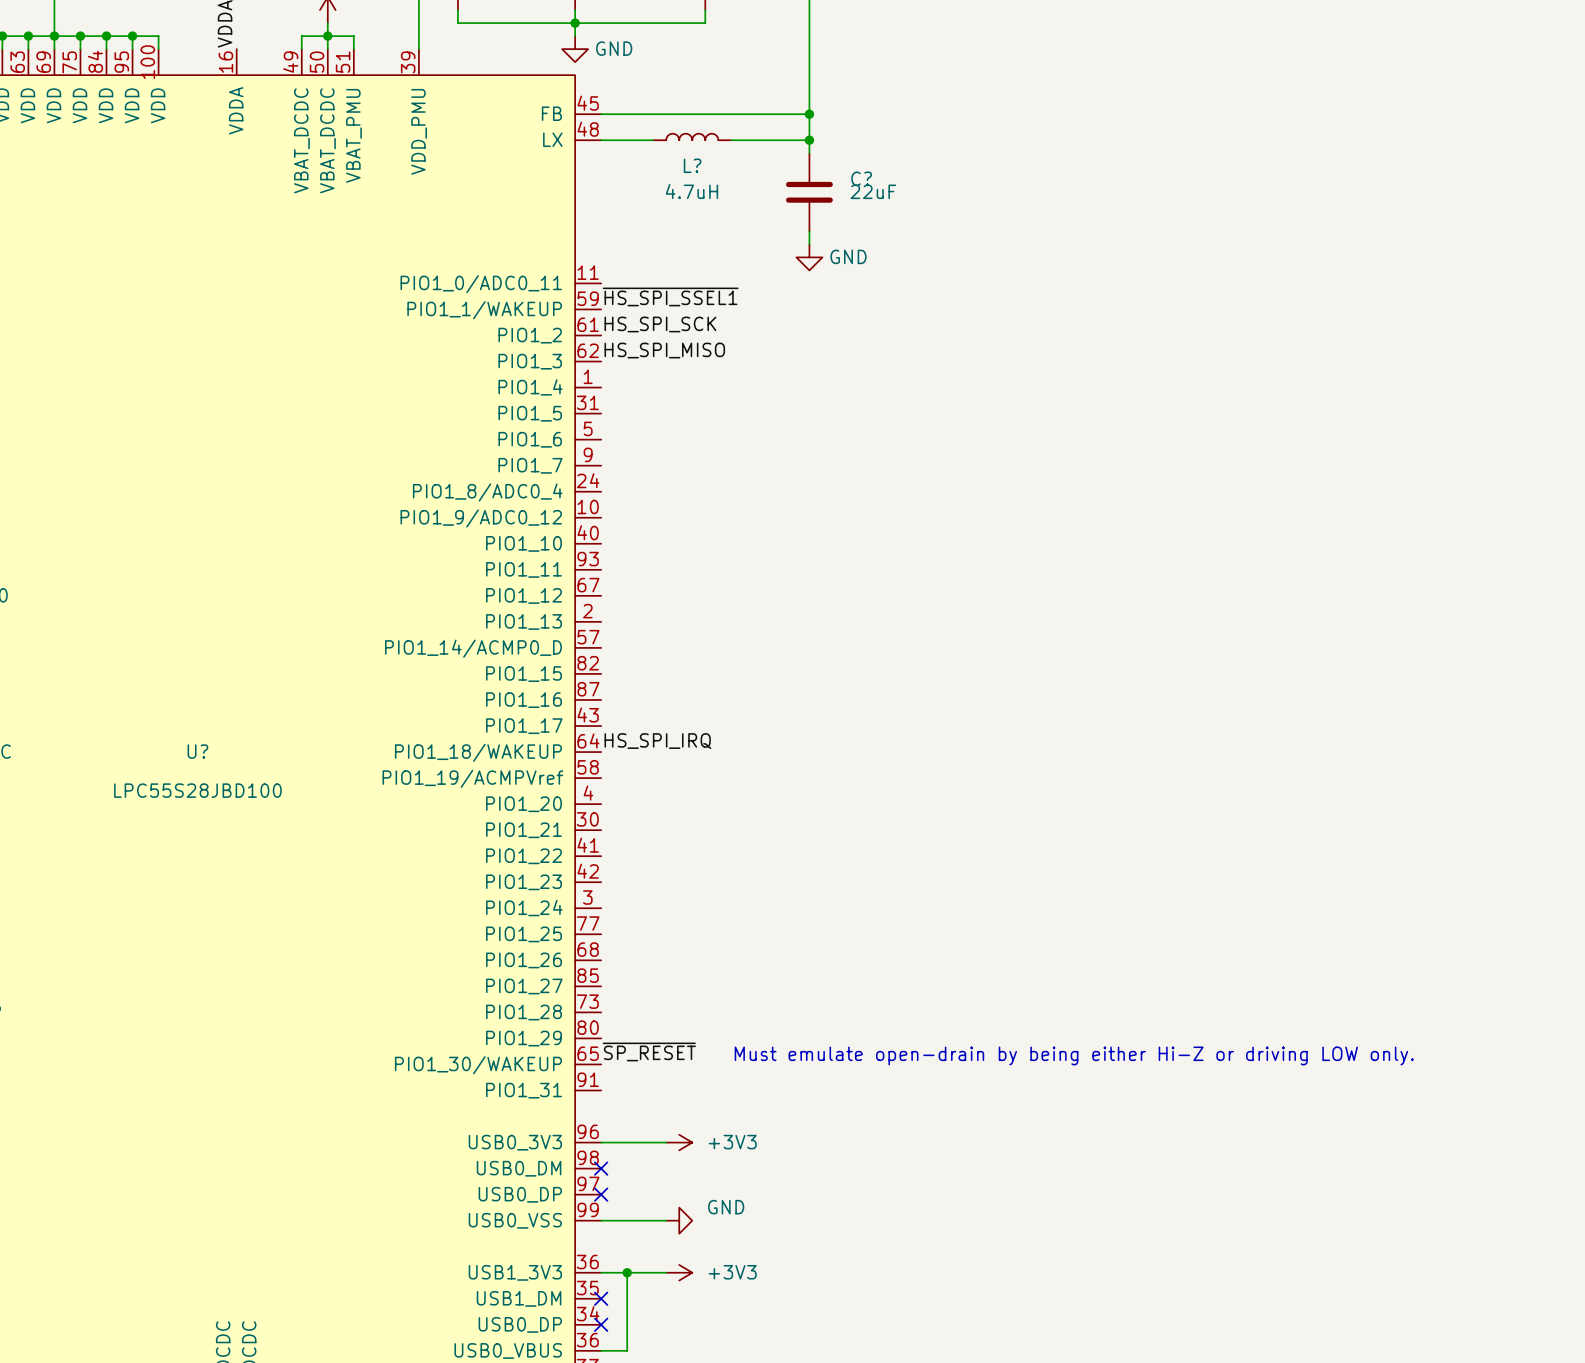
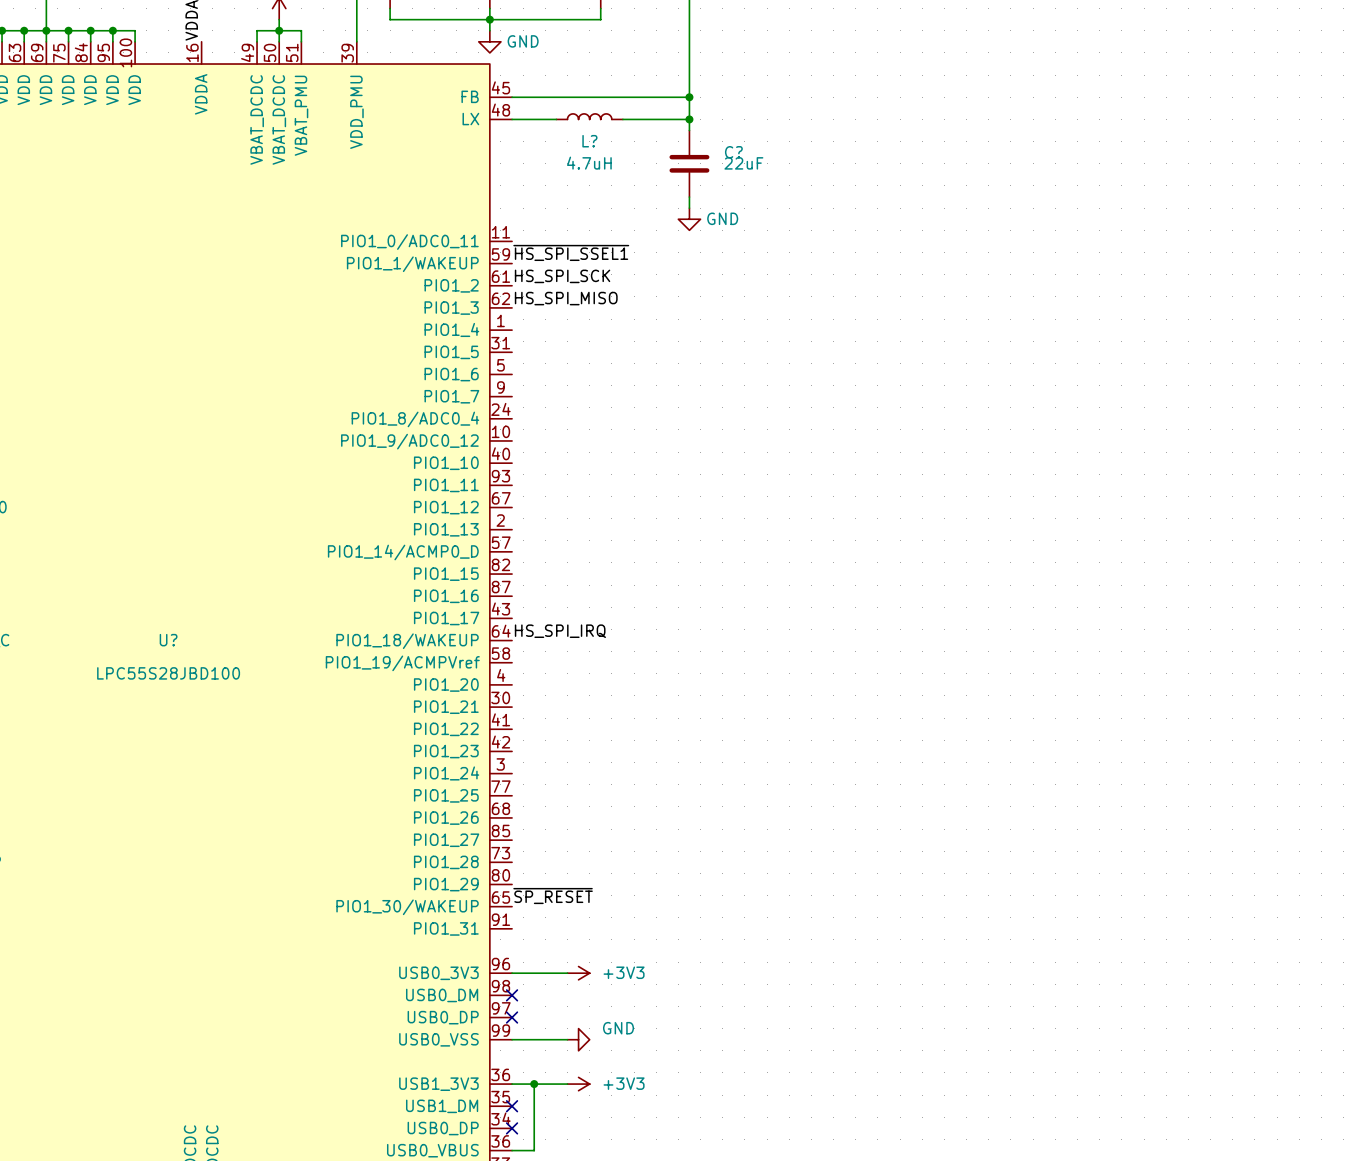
text: Must emulate open-drain by being either Hi-Z or driving LOW only. (1074, 1055) -> none

